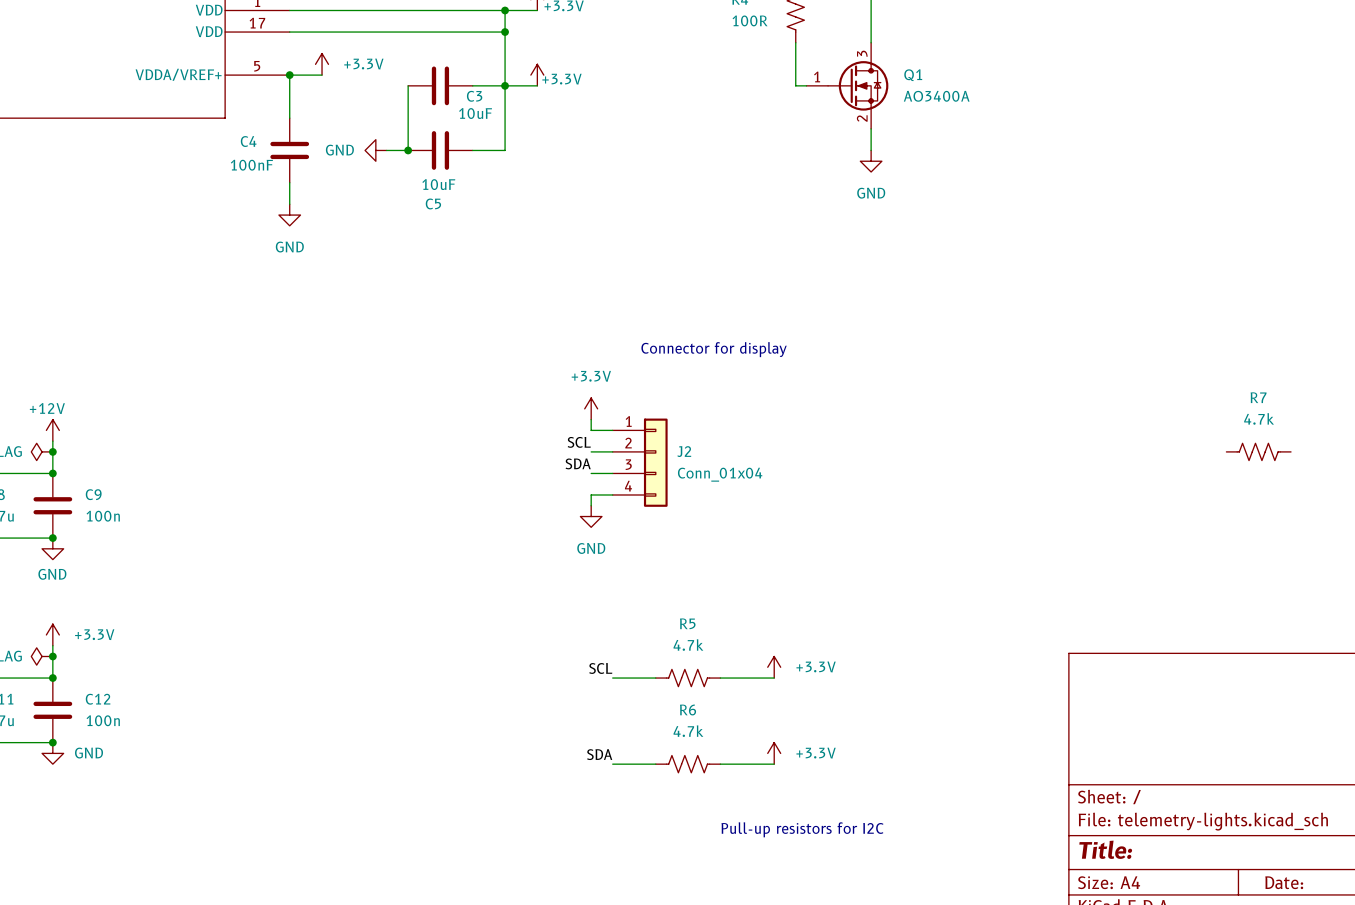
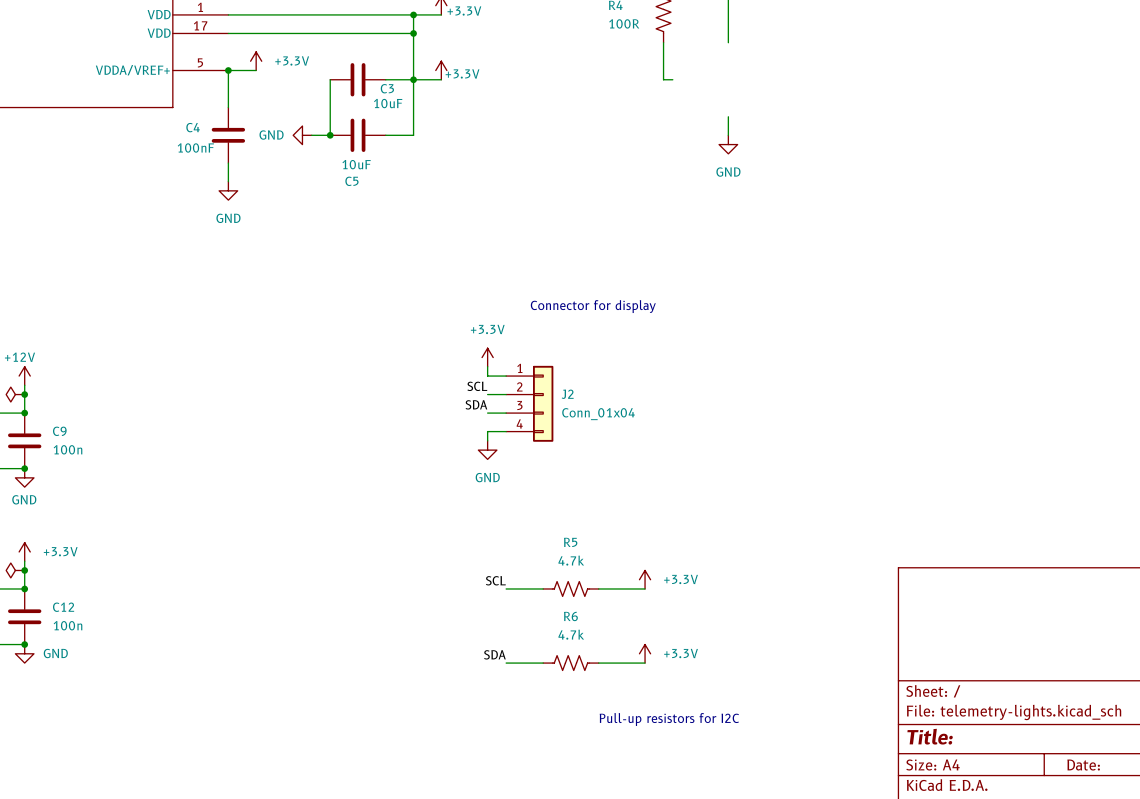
Q1: AO3400A (847, 85) -> none
R7: 4.7k (1258, 451) -> none

